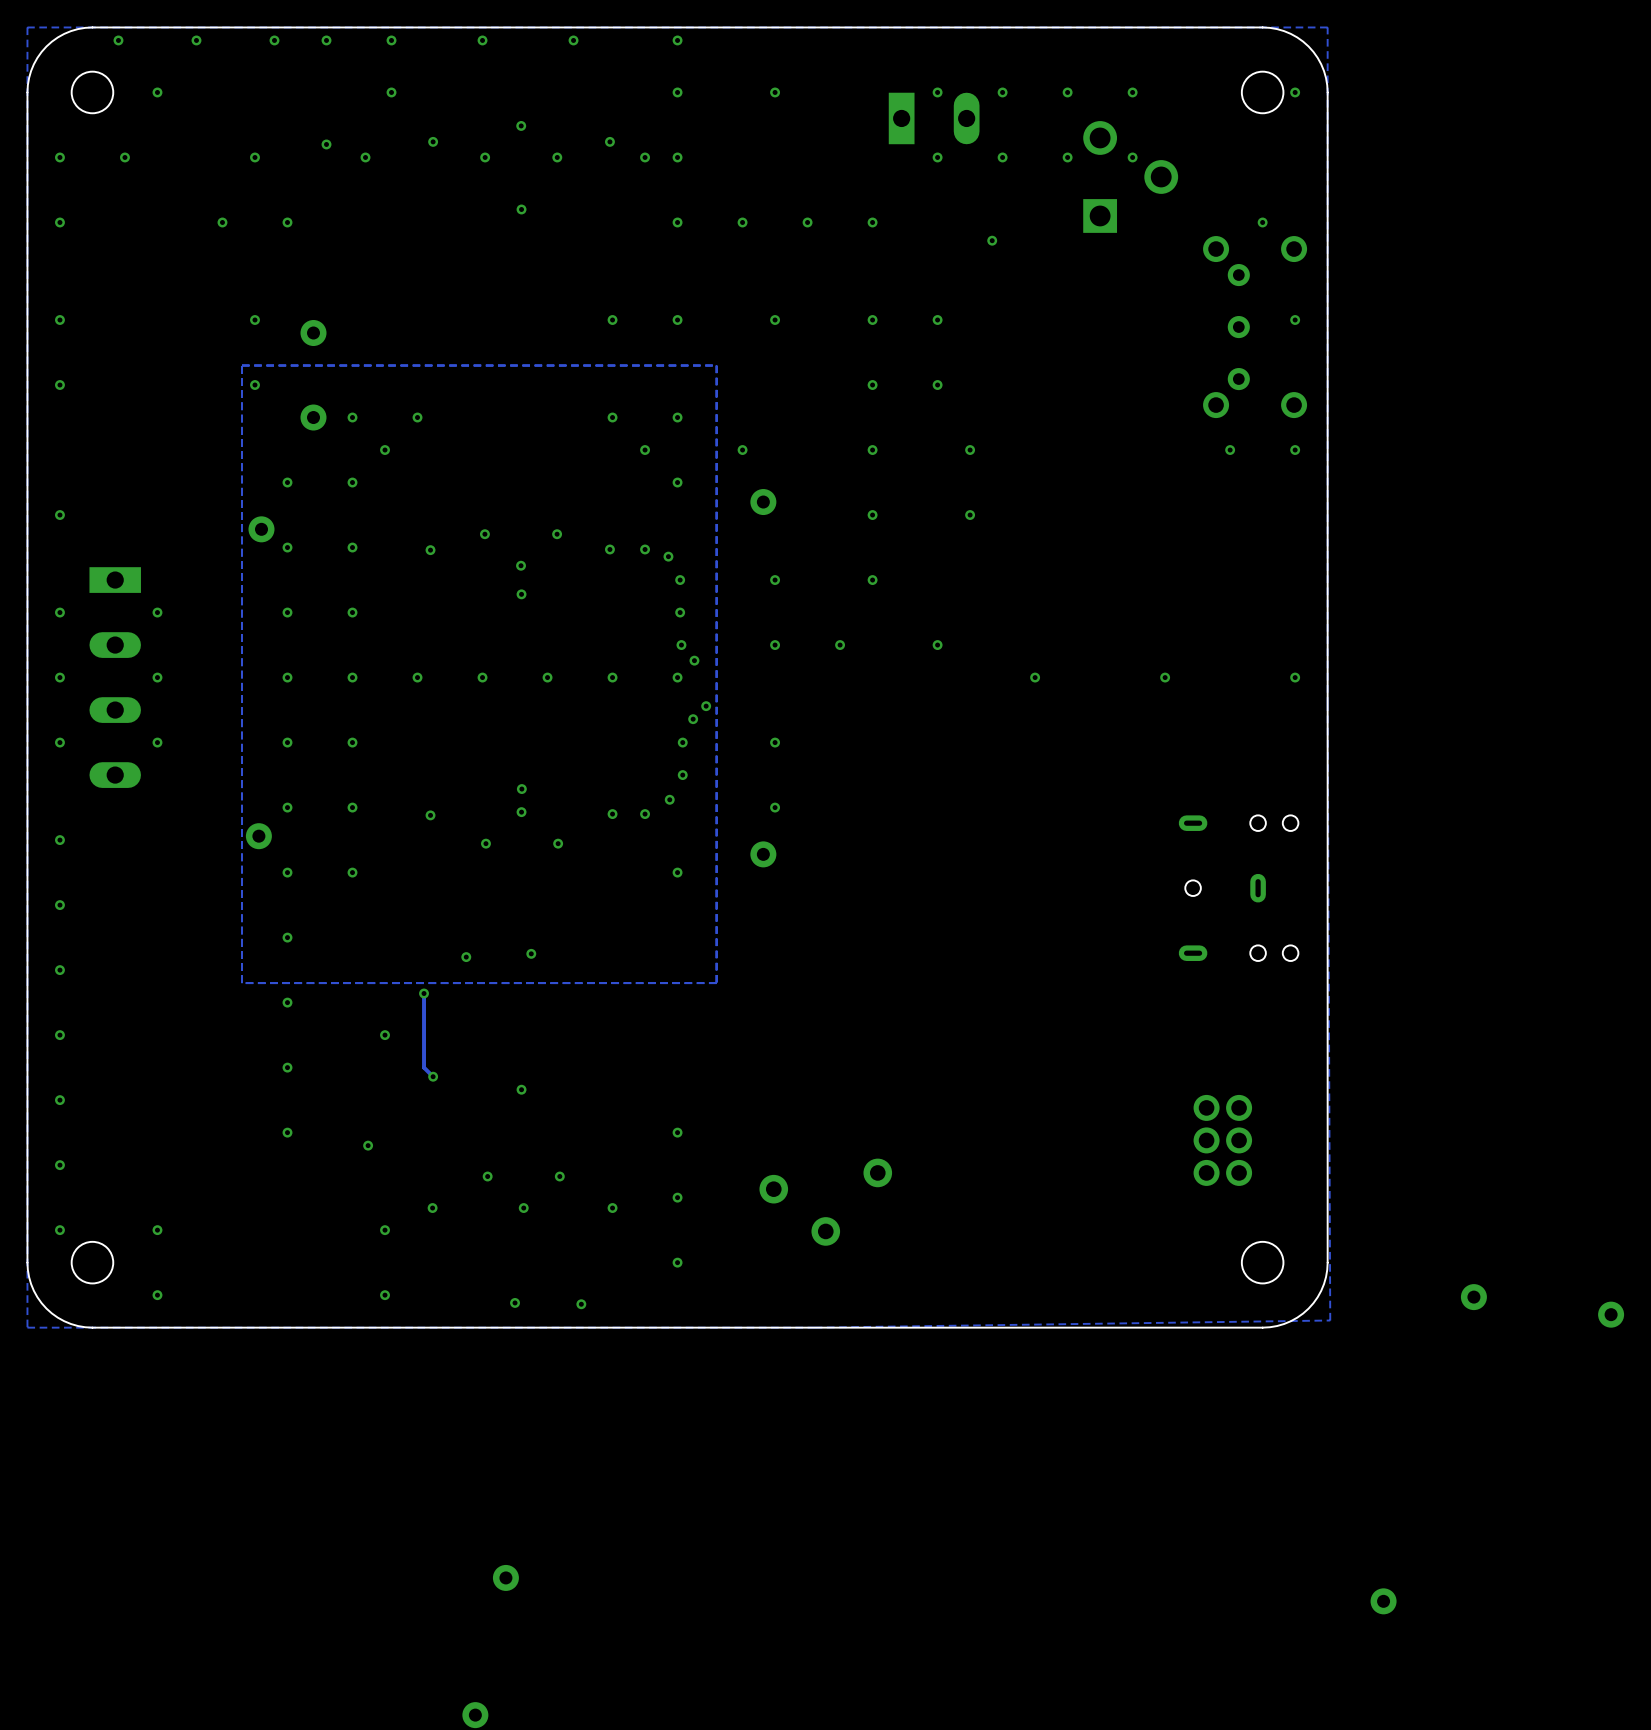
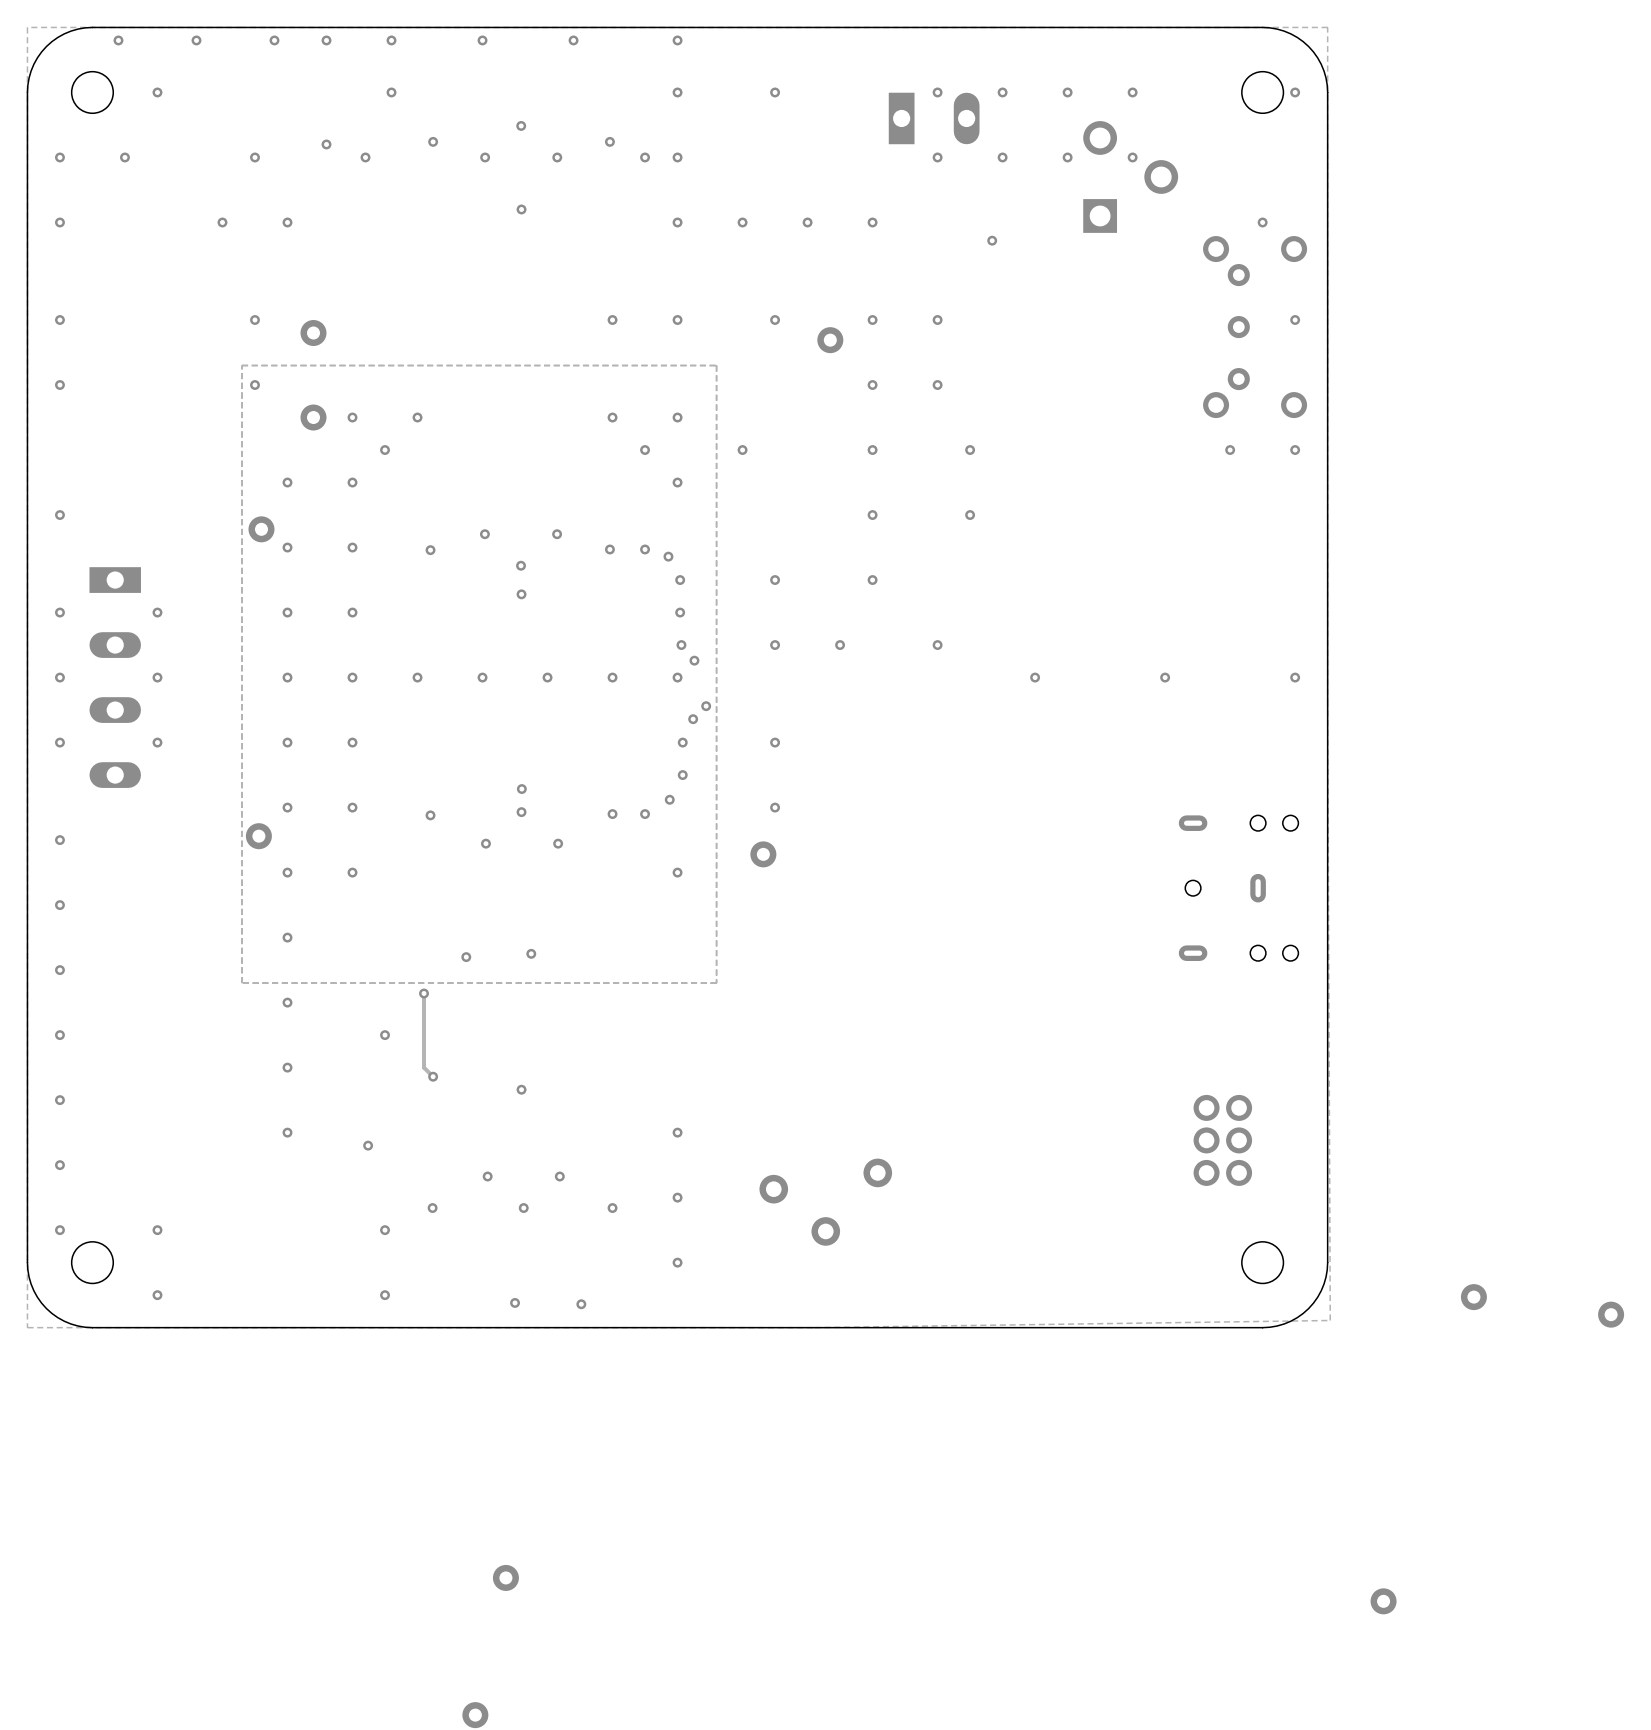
part position: (763, 502) -> (830, 340)

